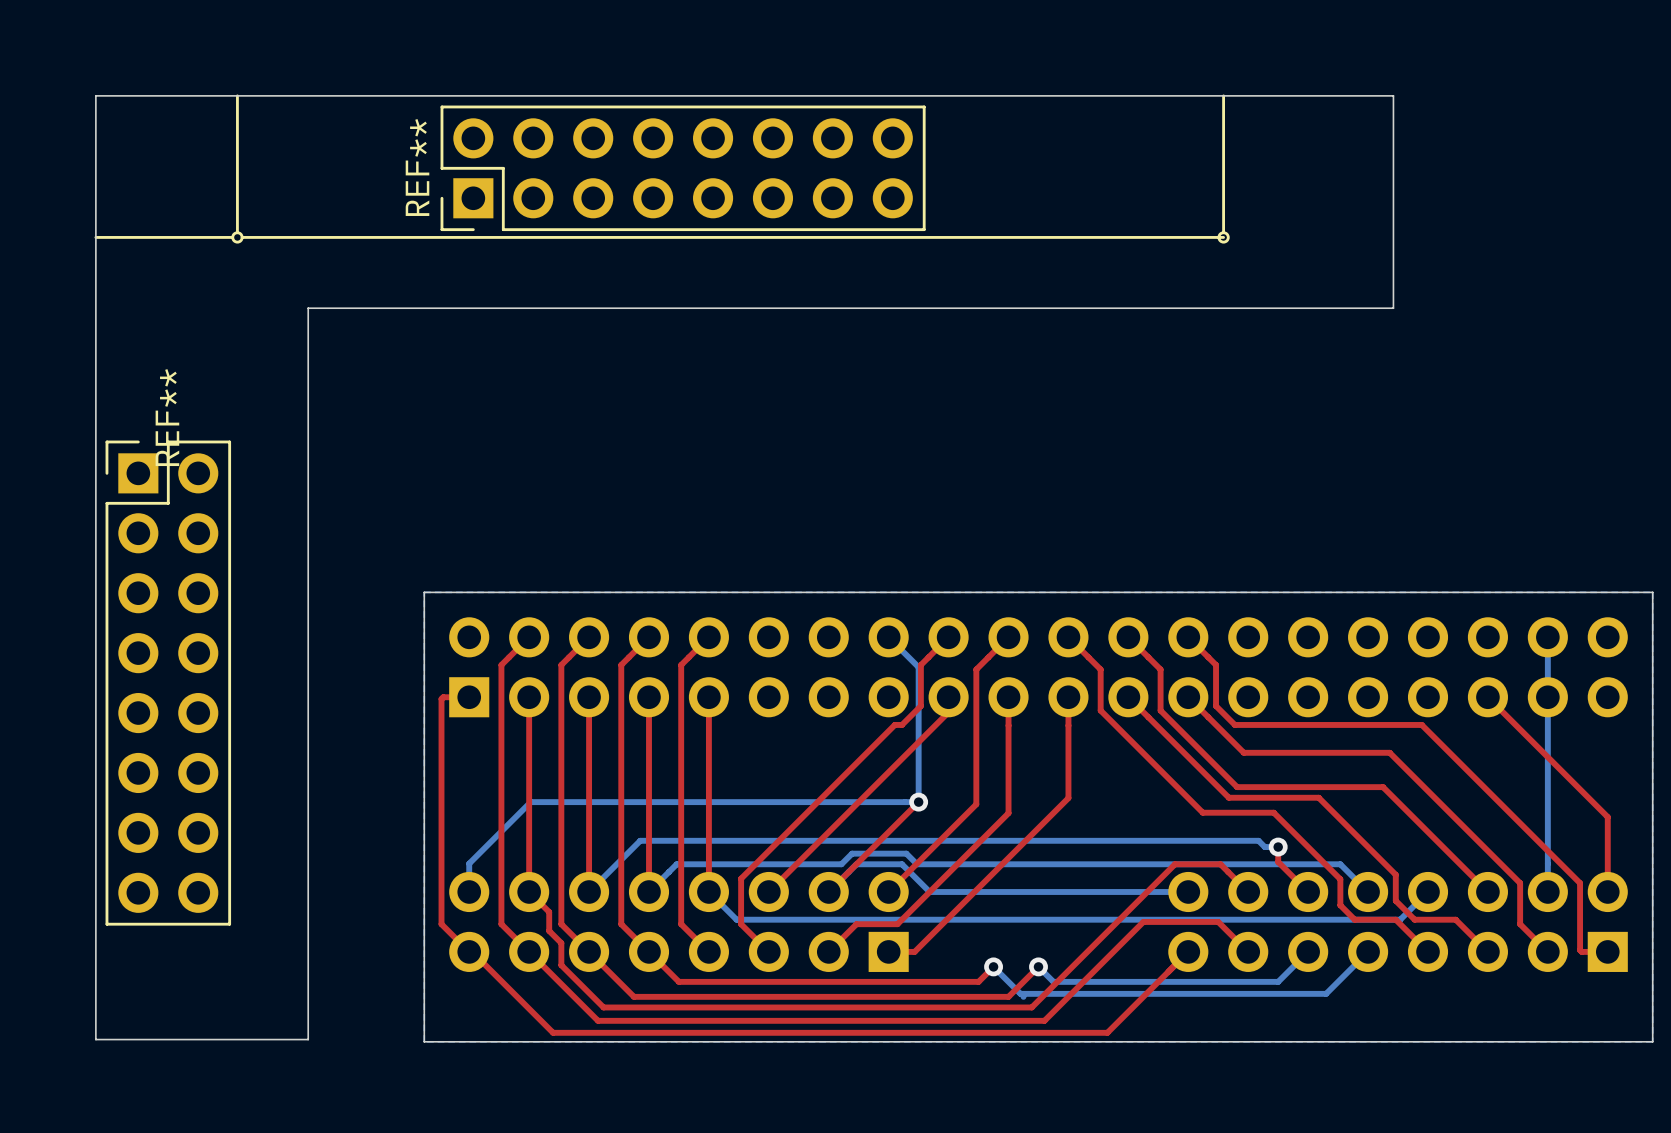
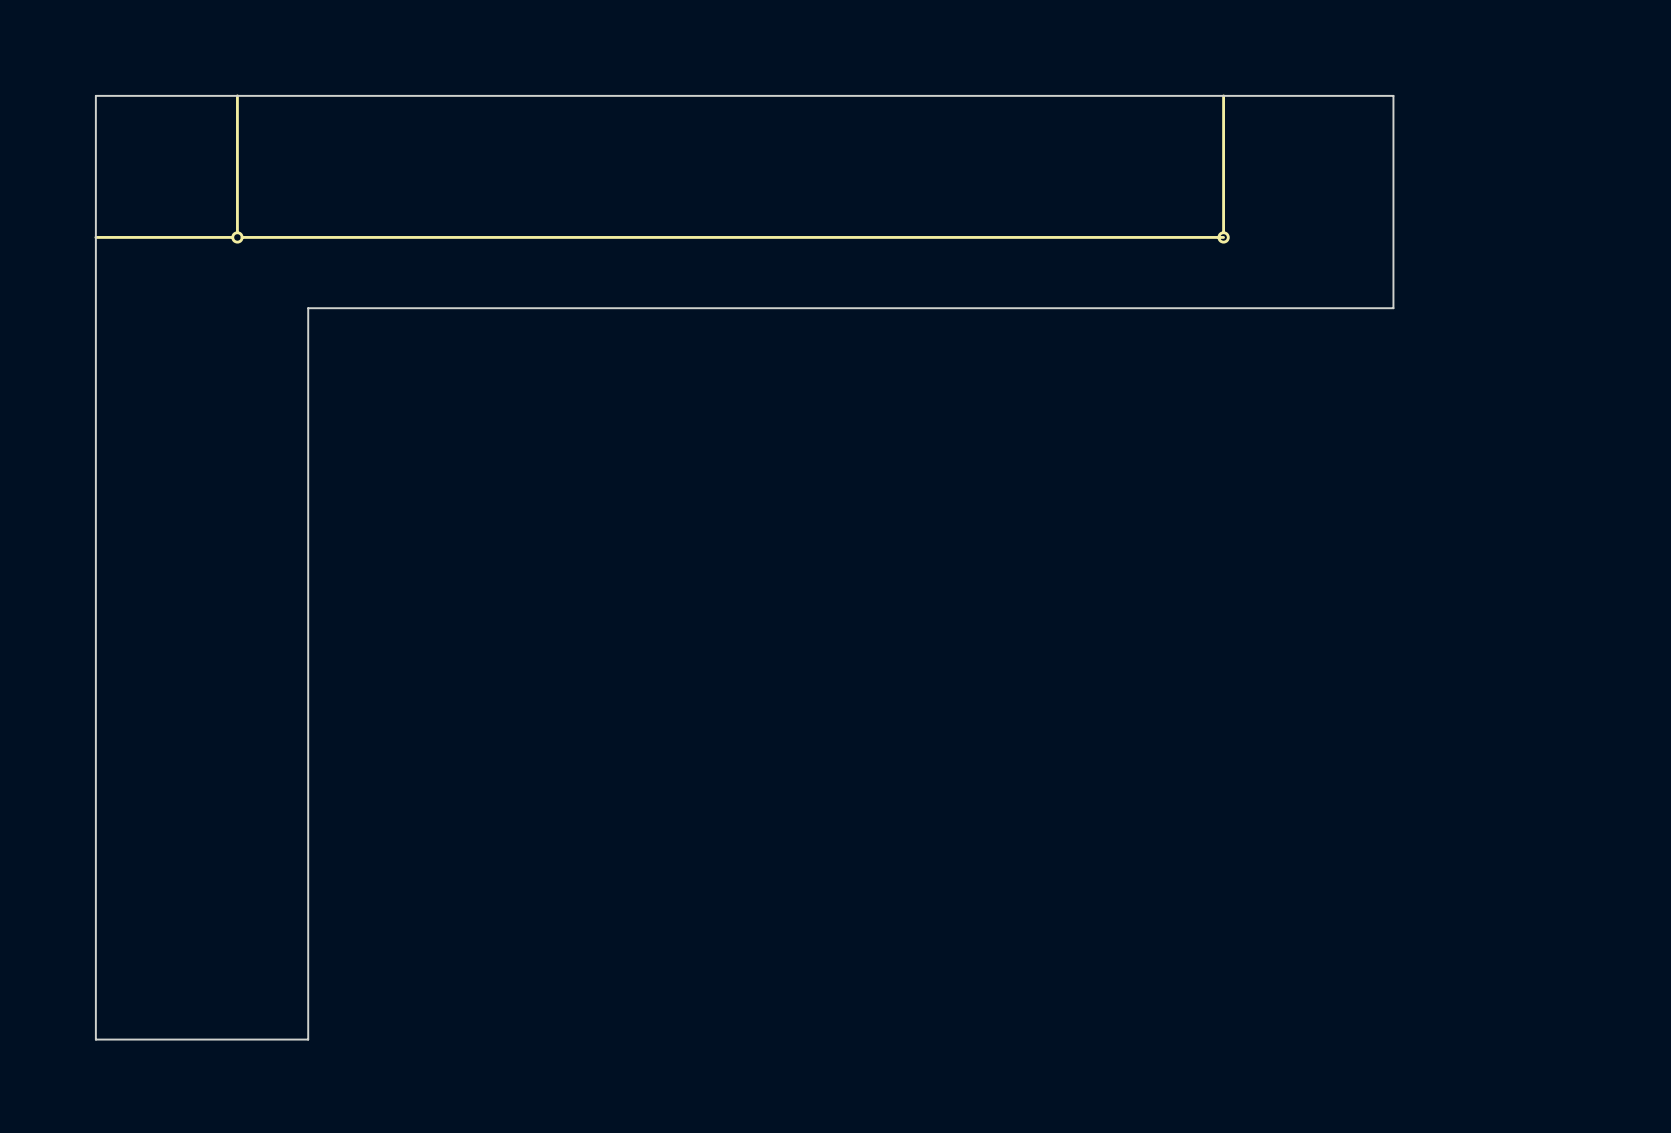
REF**: (683, 168) -> none
board edge: (424, 592) (424, 1041) (1652, 1041) (1652, 592) (424, 592) -> none
top track: (529, 637) (501, 665) (501, 924) (598, 1020) (1044, 1020) (1143, 921) (1218, 921) (1248, 951) -> none
top track: (589, 637) (561, 665) (561, 924) (634, 996) (1008, 996) (1038, 966) -> none
top track: (648, 637) (621, 665) (621, 924) (678, 981) (978, 981) (993, 966) -> none
top track: (708, 637) (681, 665) (681, 924) (708, 951) -> none
bottom track: (888, 637) (918, 667) (918, 802) (530, 802) (469, 863) (469, 891) -> none
top track: (948, 637) (920, 665) (920, 706) (902, 724) (894, 724) (741, 878) (741, 924) (768, 951) -> none
top track: (1008, 637) (976, 669) (976, 804) (888, 891) -> none
top track: (1068, 637) (1100, 669) (1100, 710) (1202, 812) (1273, 812) (1340, 879) (1340, 905) (1354, 919) (1395, 919) (1428, 951) -> none
top track: (1128, 637) (1160, 669) (1160, 710) (1237, 787) (1383, 787) (1487, 891) -> none
top track: (1188, 637) (1216, 665) (1216, 706) (1234, 724) (1421, 724) (1580, 883) (1580, 950) (1581, 951) (1607, 951) -> none
bottom track: (1547, 637) (1547, 891) -> none
part: (1038, 667) -> none
REF**: (168, 683) -> none
top track: (469, 697) (443, 697) (441, 699) (441, 924) (469, 951) (472, 951) (553, 1032) (1107, 1032) (1188, 951) -> none
top track: (529, 697) (529, 891) (549, 912) (549, 930) (561, 943) (561, 965) (603, 1007) (1031, 1007) (1175, 864) (1220, 864) (1248, 891) -> none
top track: (589, 697) (589, 891) -> none
top track: (648, 697) (648, 891) -> none
top track: (708, 697) (708, 891) -> none
top track: (948, 697) (948, 712) (768, 891) -> none
top track: (1008, 697) (1008, 813) (897, 924) (856, 924) (828, 951) -> none
top track: (1068, 697) (1068, 798) (914, 951) (888, 951) -> none
top track: (1128, 697) (1228, 797) (1318, 797) (1395, 874) (1395, 900) (1414, 919) (1455, 919) (1487, 951) -> none
top track: (1188, 697) (1243, 752) (1389, 752) (1520, 883) (1520, 924) (1547, 951) -> none
top track: (1487, 697) (1607, 817) (1607, 891) -> none
top track: (918, 802) (828, 891) -> none
via: (918, 802) -> none
top track: (1278, 847) (1278, 862) (1308, 891) -> none
bottom track: (1278, 847) (1264, 847) (1258, 840) (640, 840) (589, 891) -> none
via: (1278, 847) -> none
bottom track: (648, 891) (676, 864) (841, 864) (852, 853) (906, 853) (917, 864) (1340, 864) (1368, 891) -> none
bottom track: (708, 891) (736, 919) (1400, 919) (1428, 891) -> none
bottom track: (828, 891) (856, 864) (902, 864) (929, 891) (1188, 891) -> none
part: (678, 921) -> none
part: (1398, 921) -> none
bottom track: (1308, 951) (1278, 981) (1053, 981) (1038, 966) -> none
bottom track: (1368, 951) (1326, 993) (1020, 993) (993, 966) -> none
via: (993, 966) -> none
via: (1038, 966) -> none

